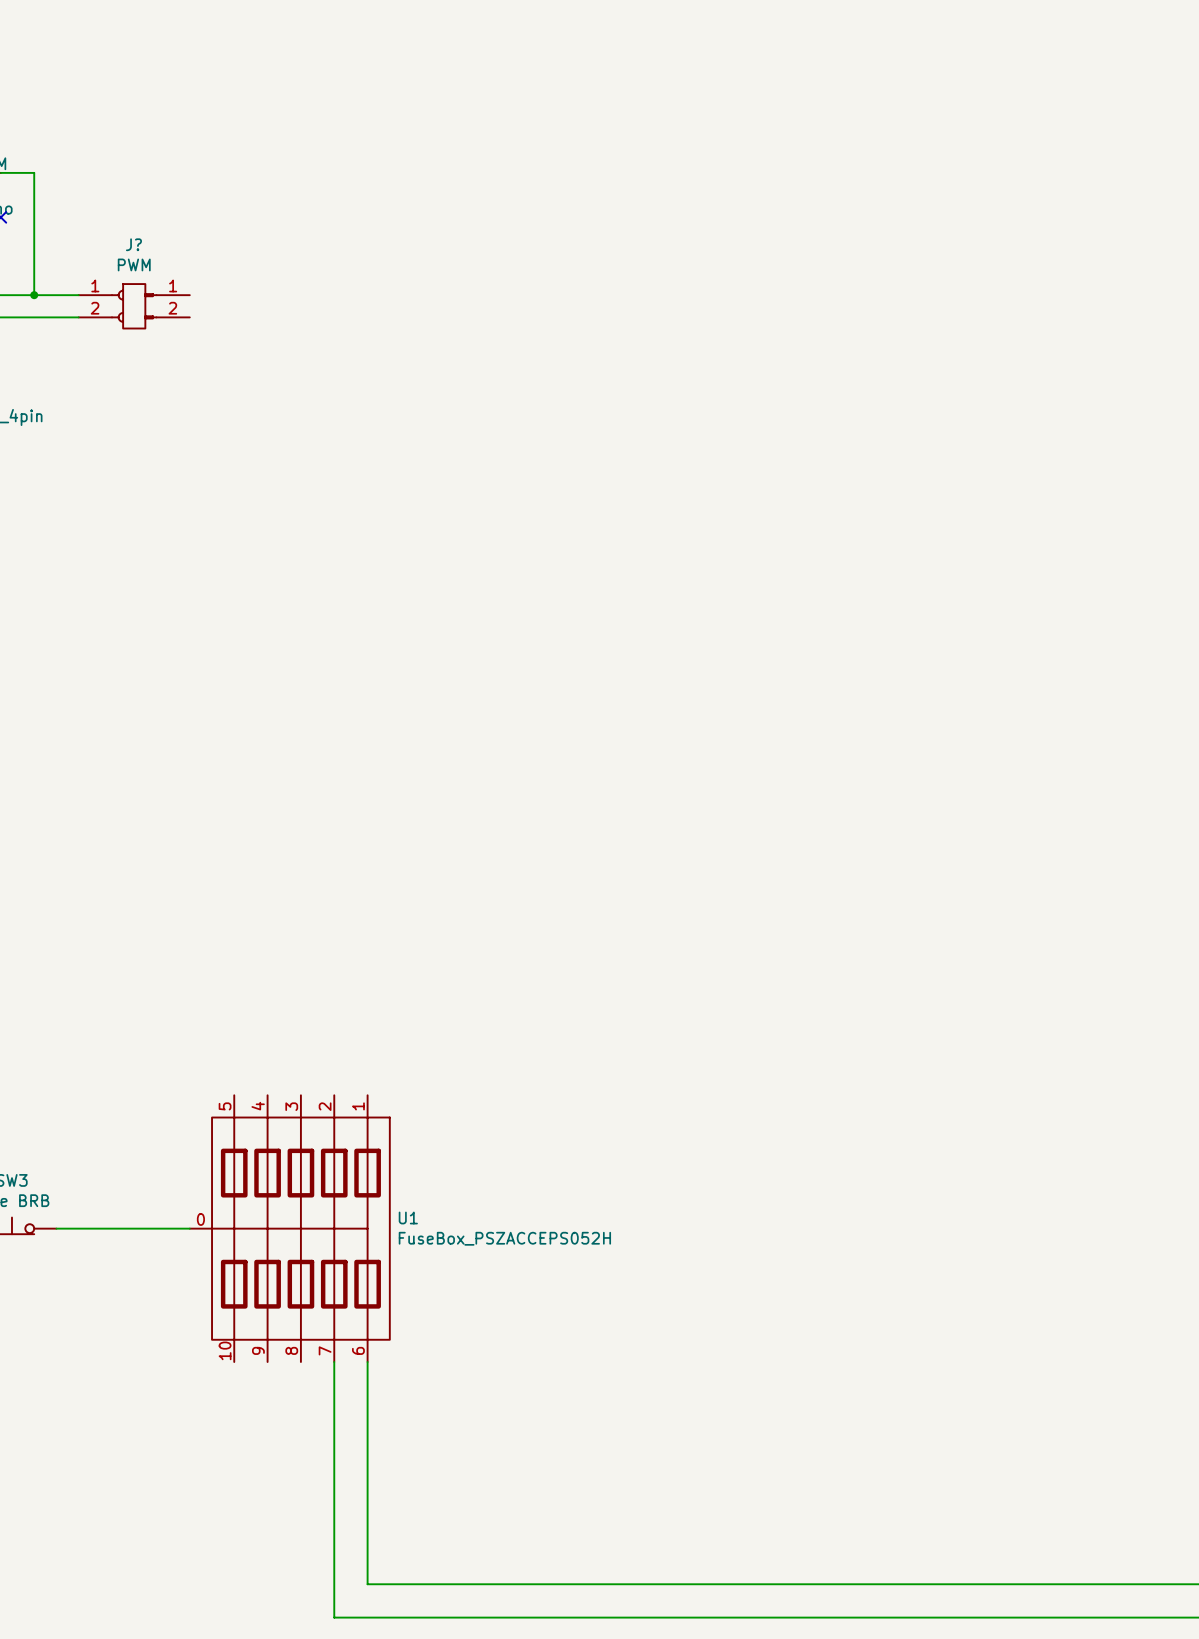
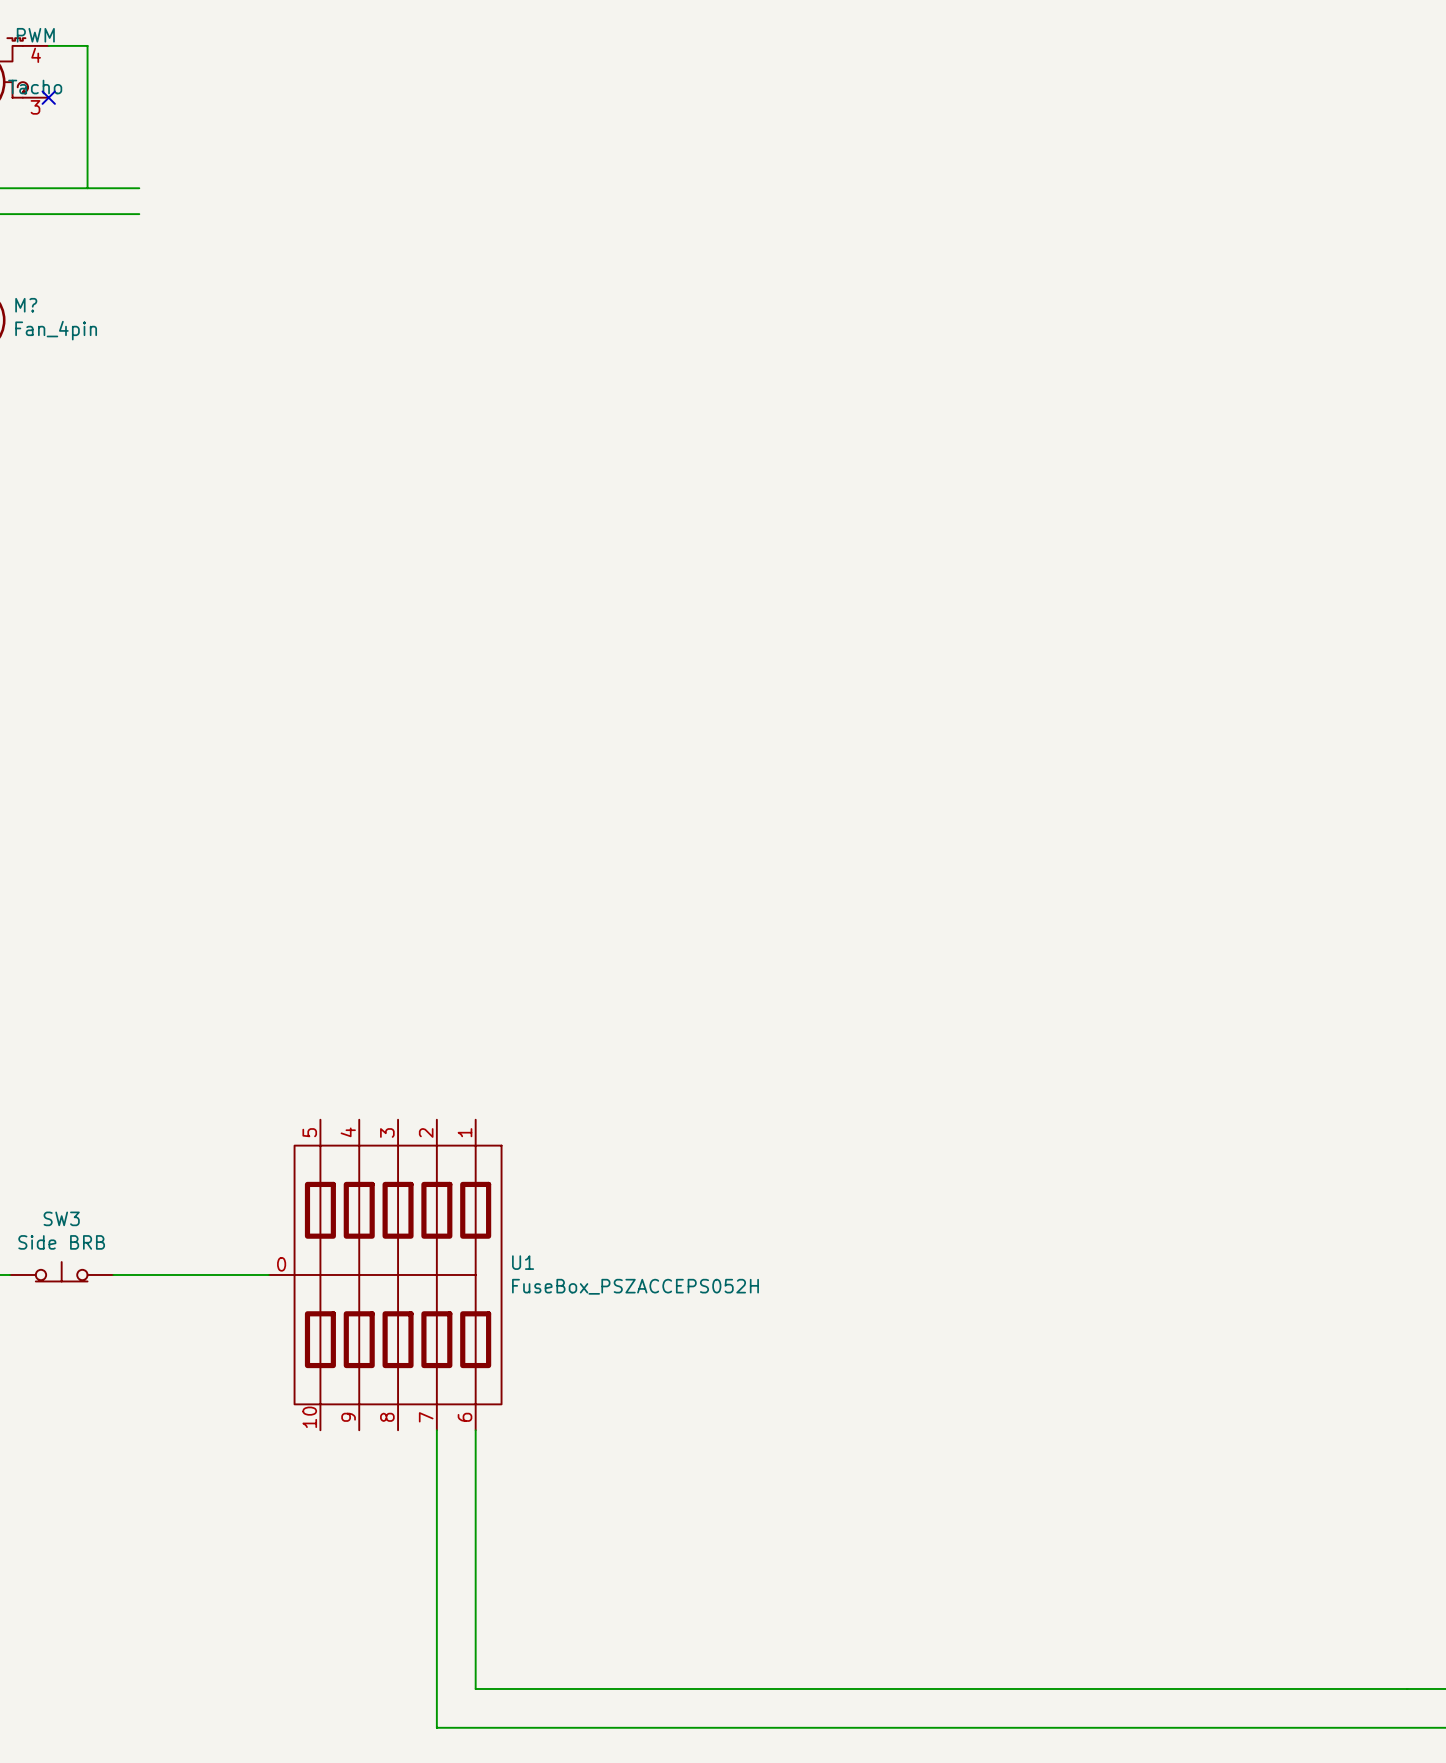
junction: (34, 295) -> none
J?: PWM (134, 306) -> none

